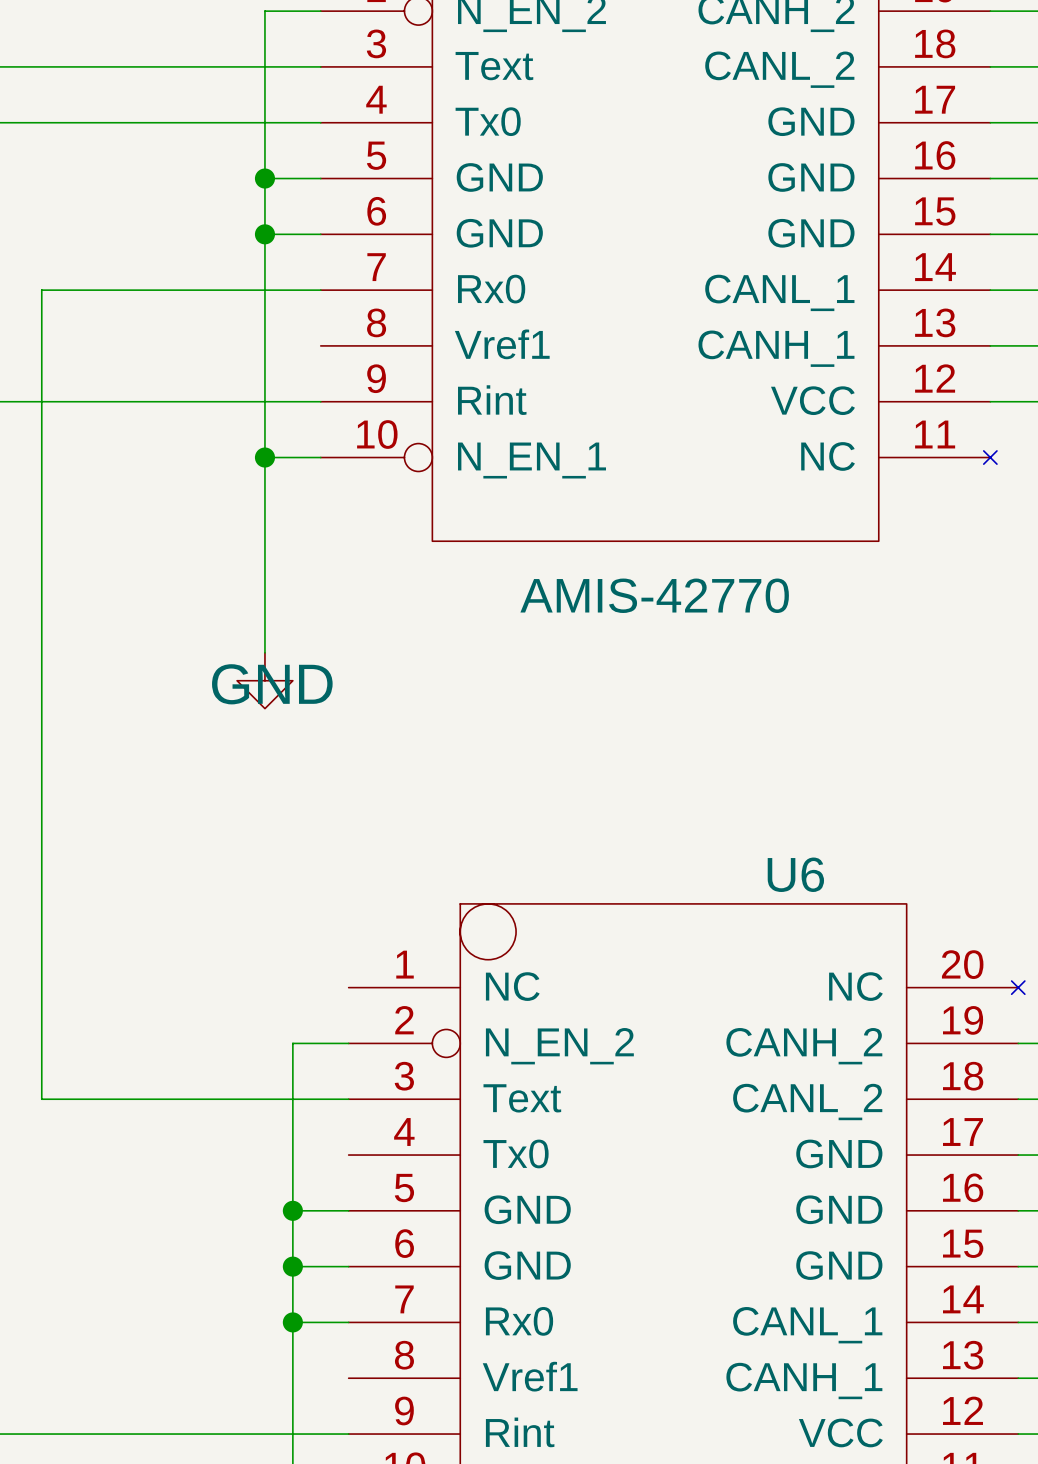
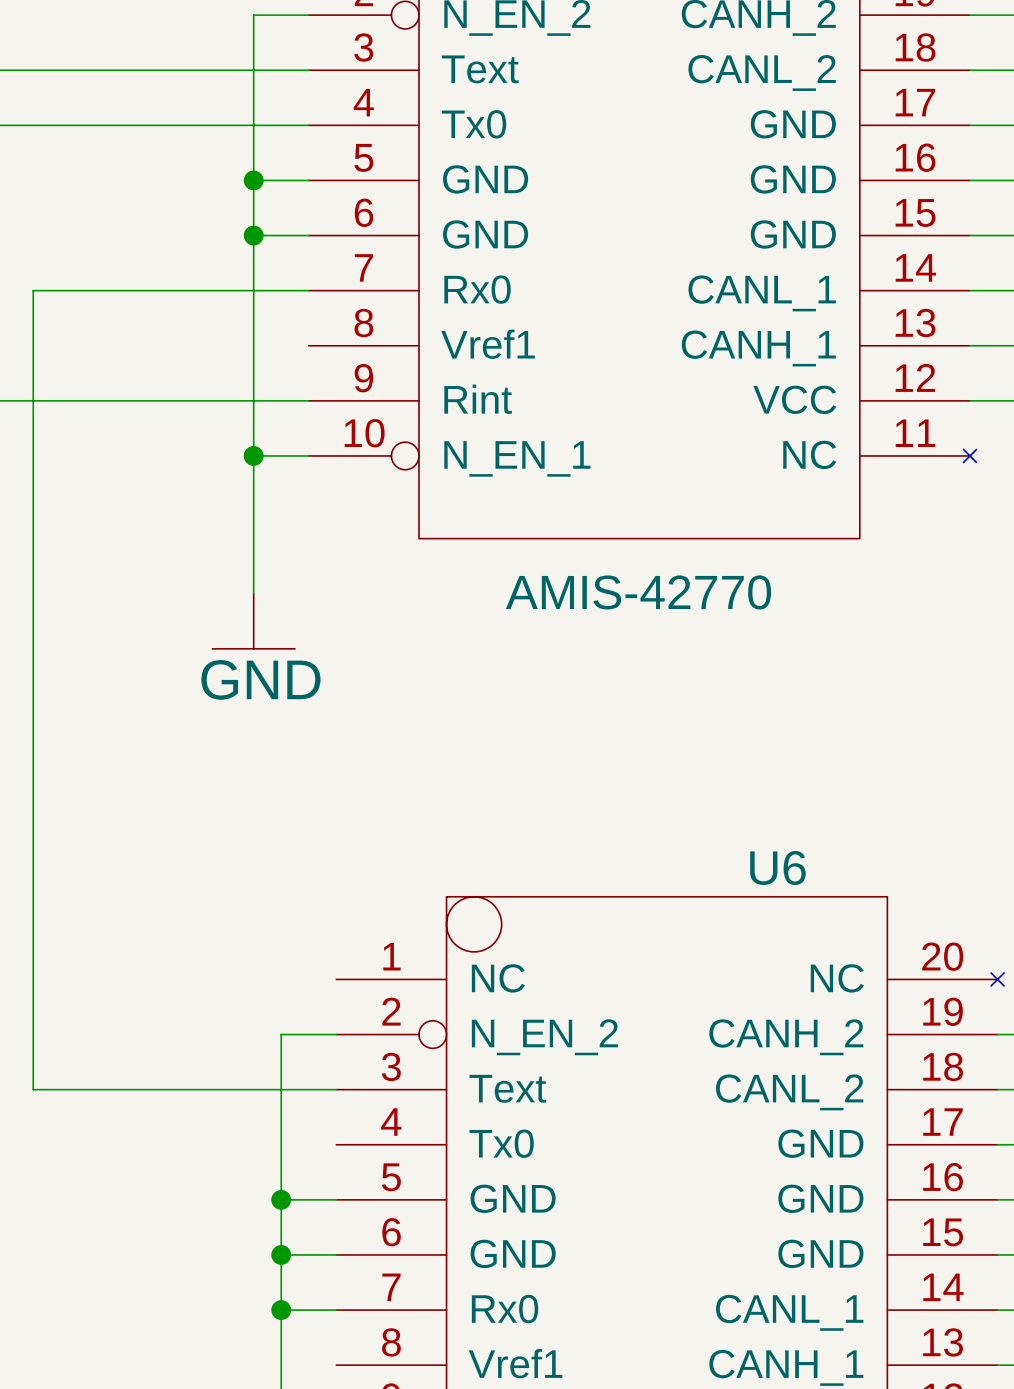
power symbol: none -> GND (253, 621)
power symbol: GND (264, 680) -> none

